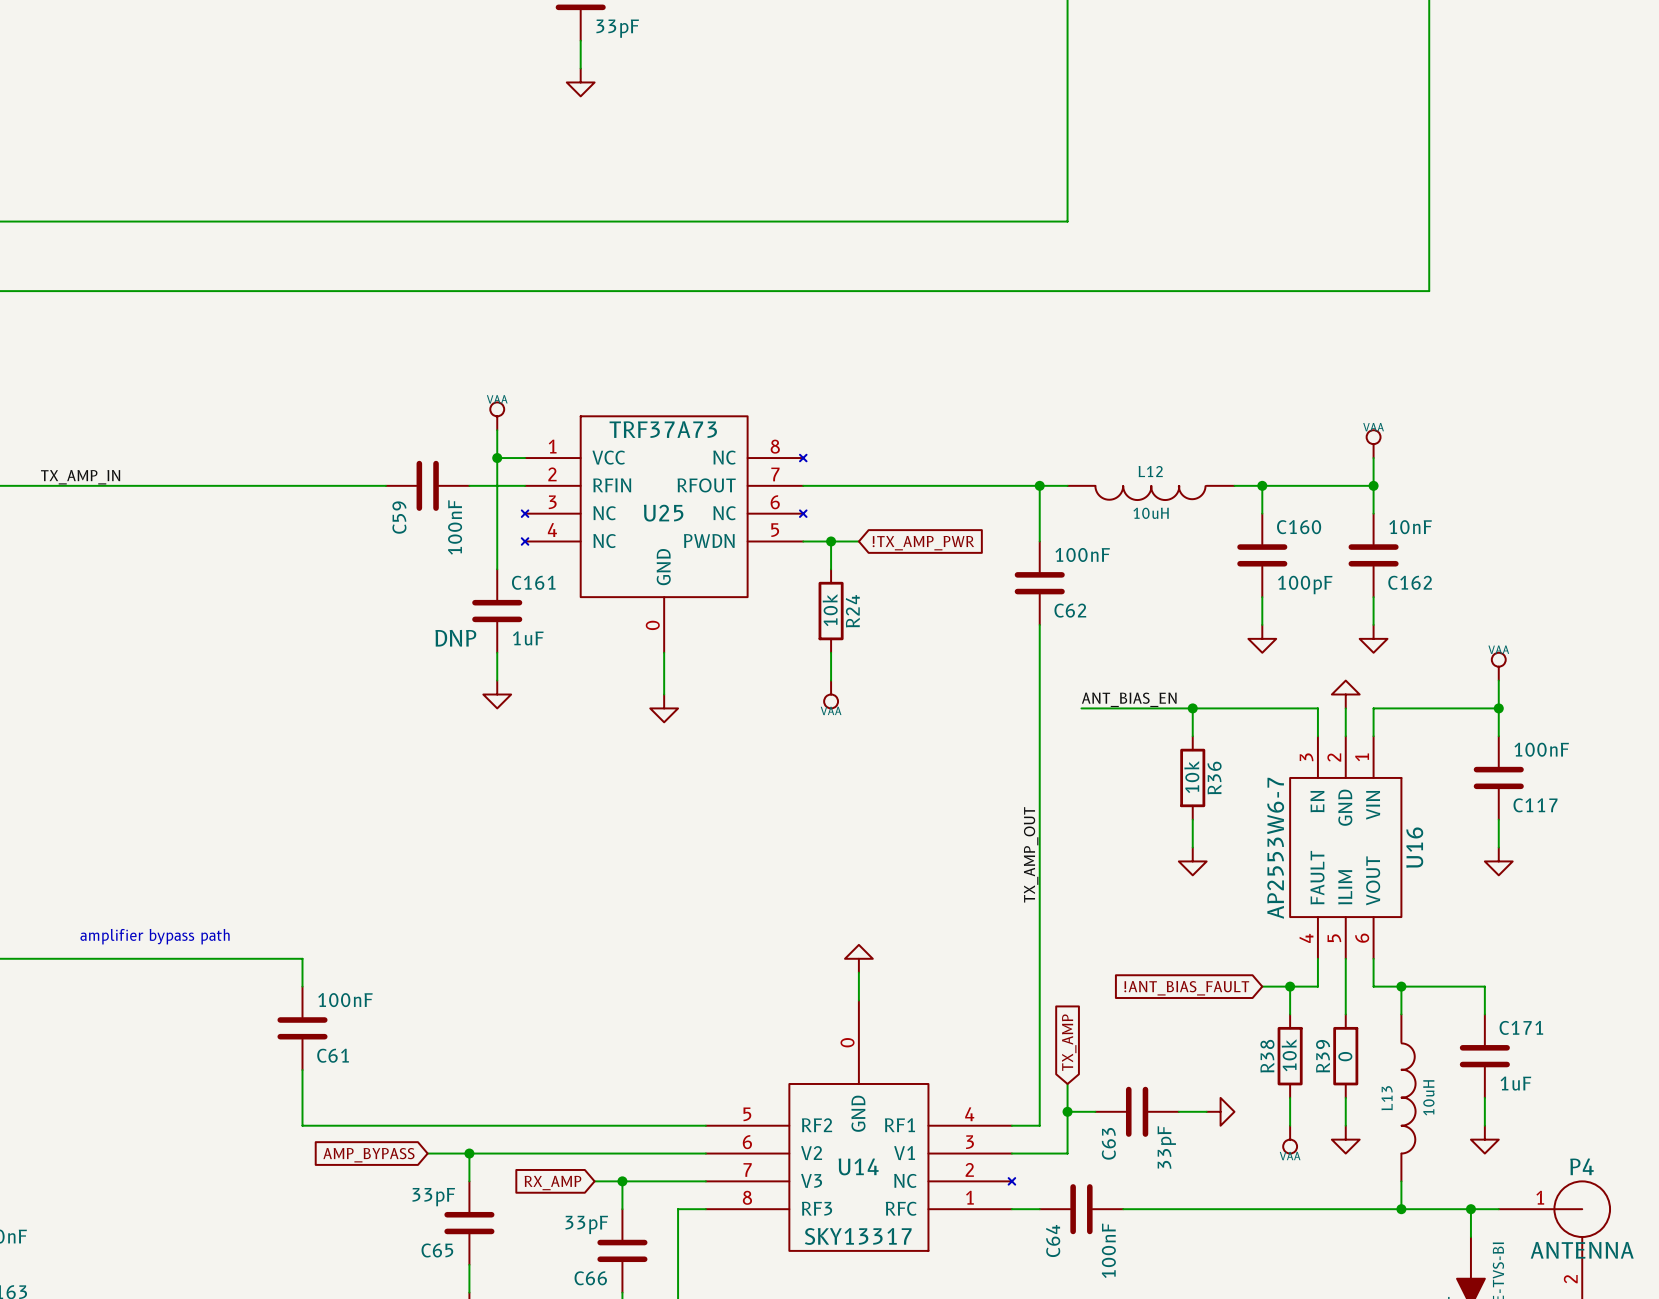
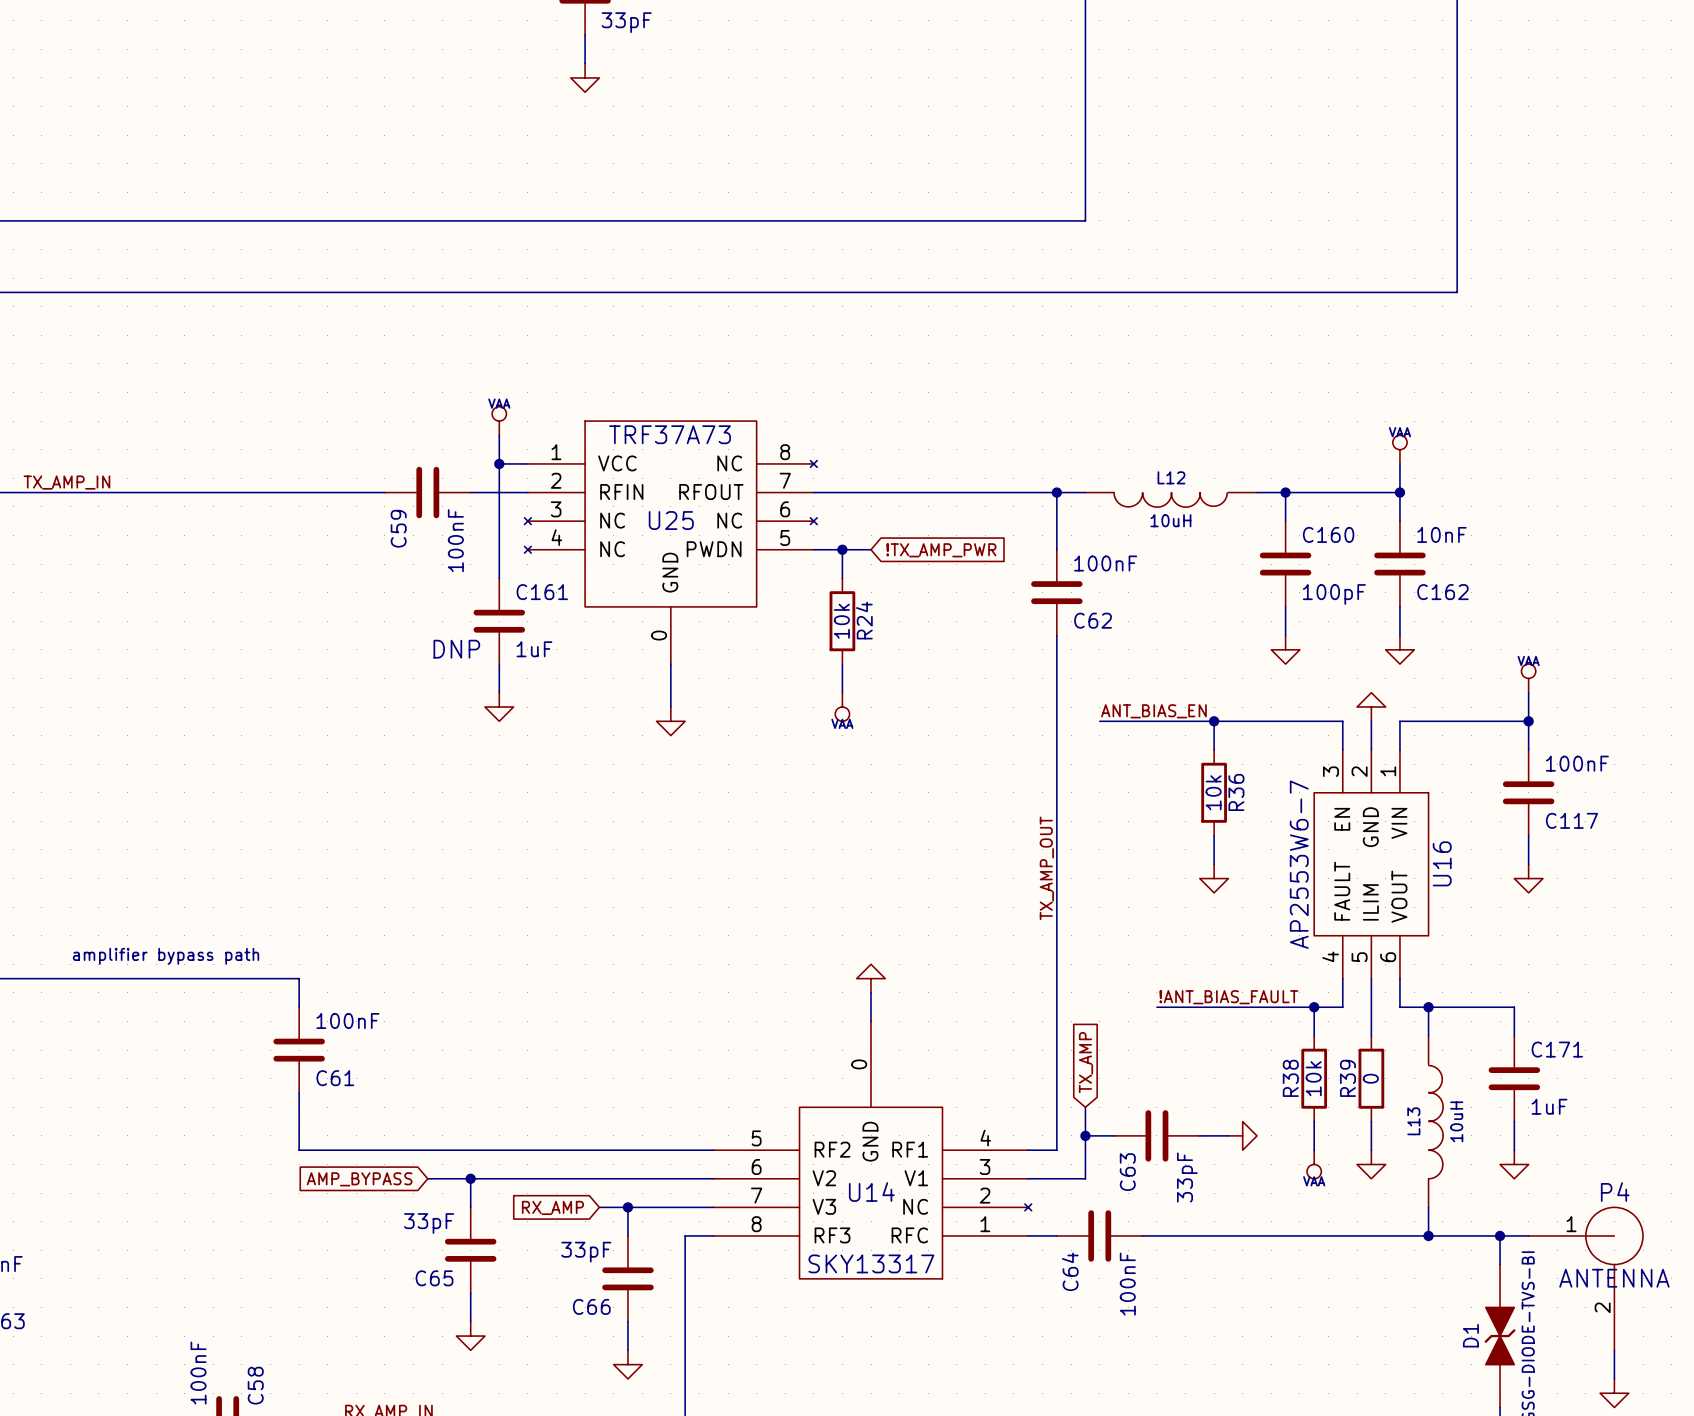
label: none -> !ANT_BIAS_FAULT (1228, 997)
wire: none -> (1156, 1007) (1285, 1007)
global label: !ANT_BIAS_FAULT (1186, 988) -> none

